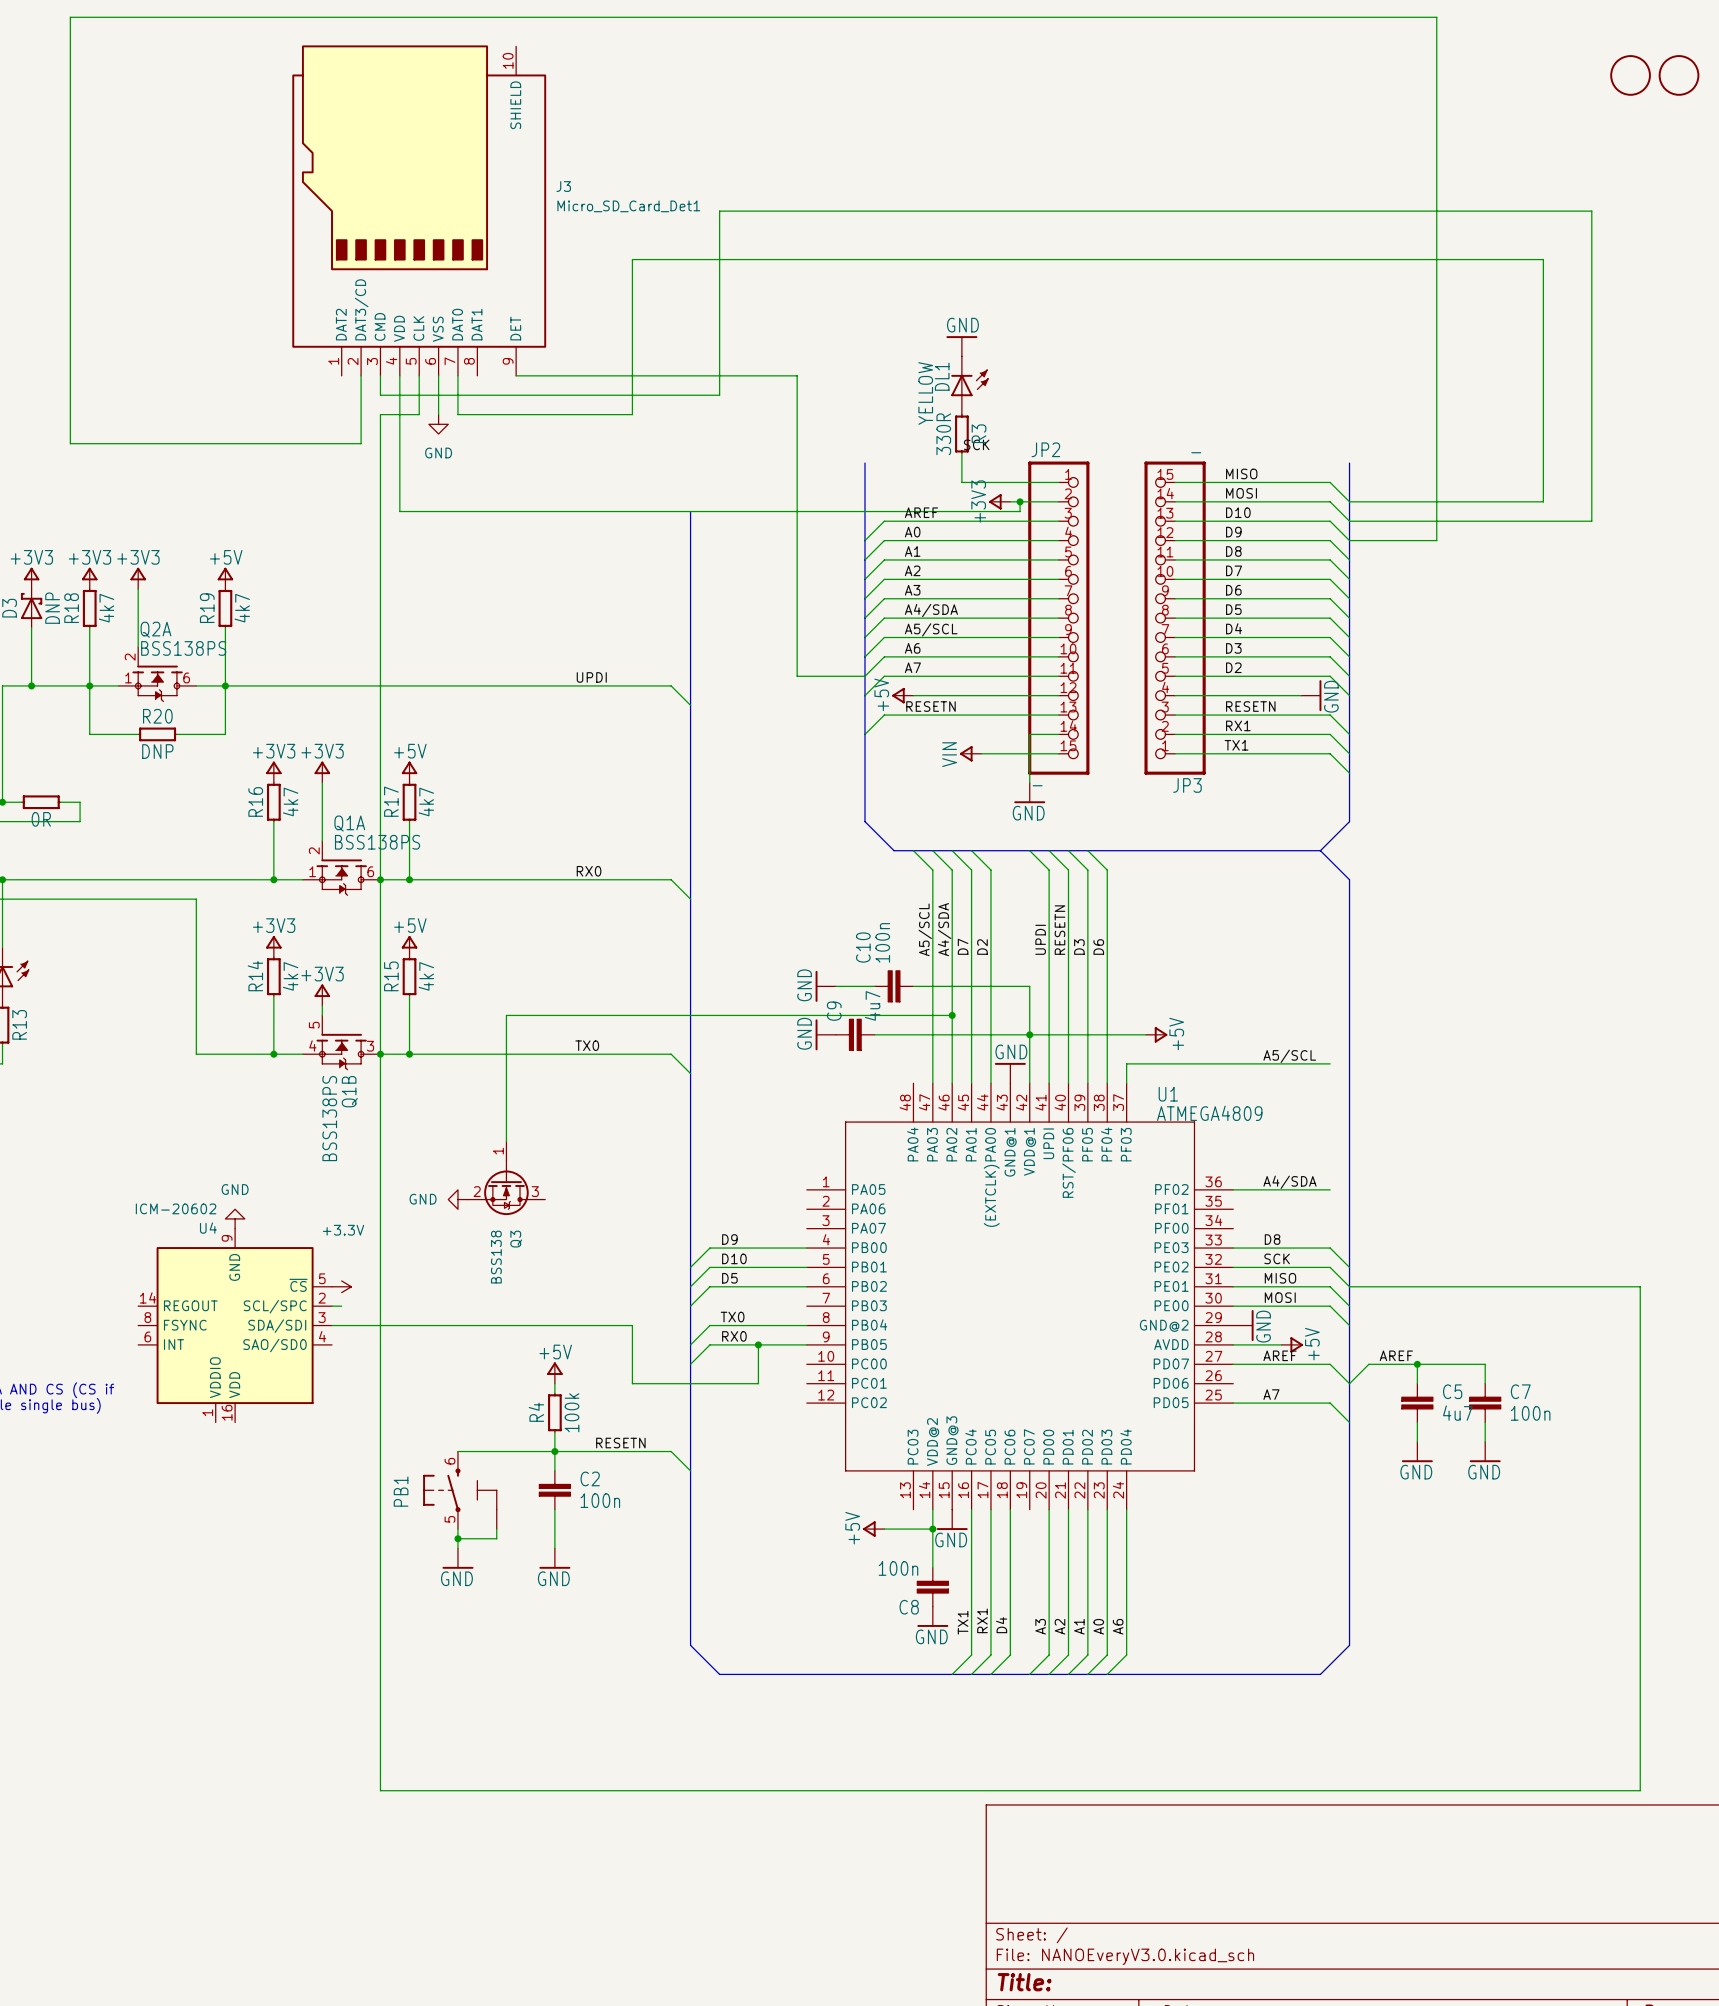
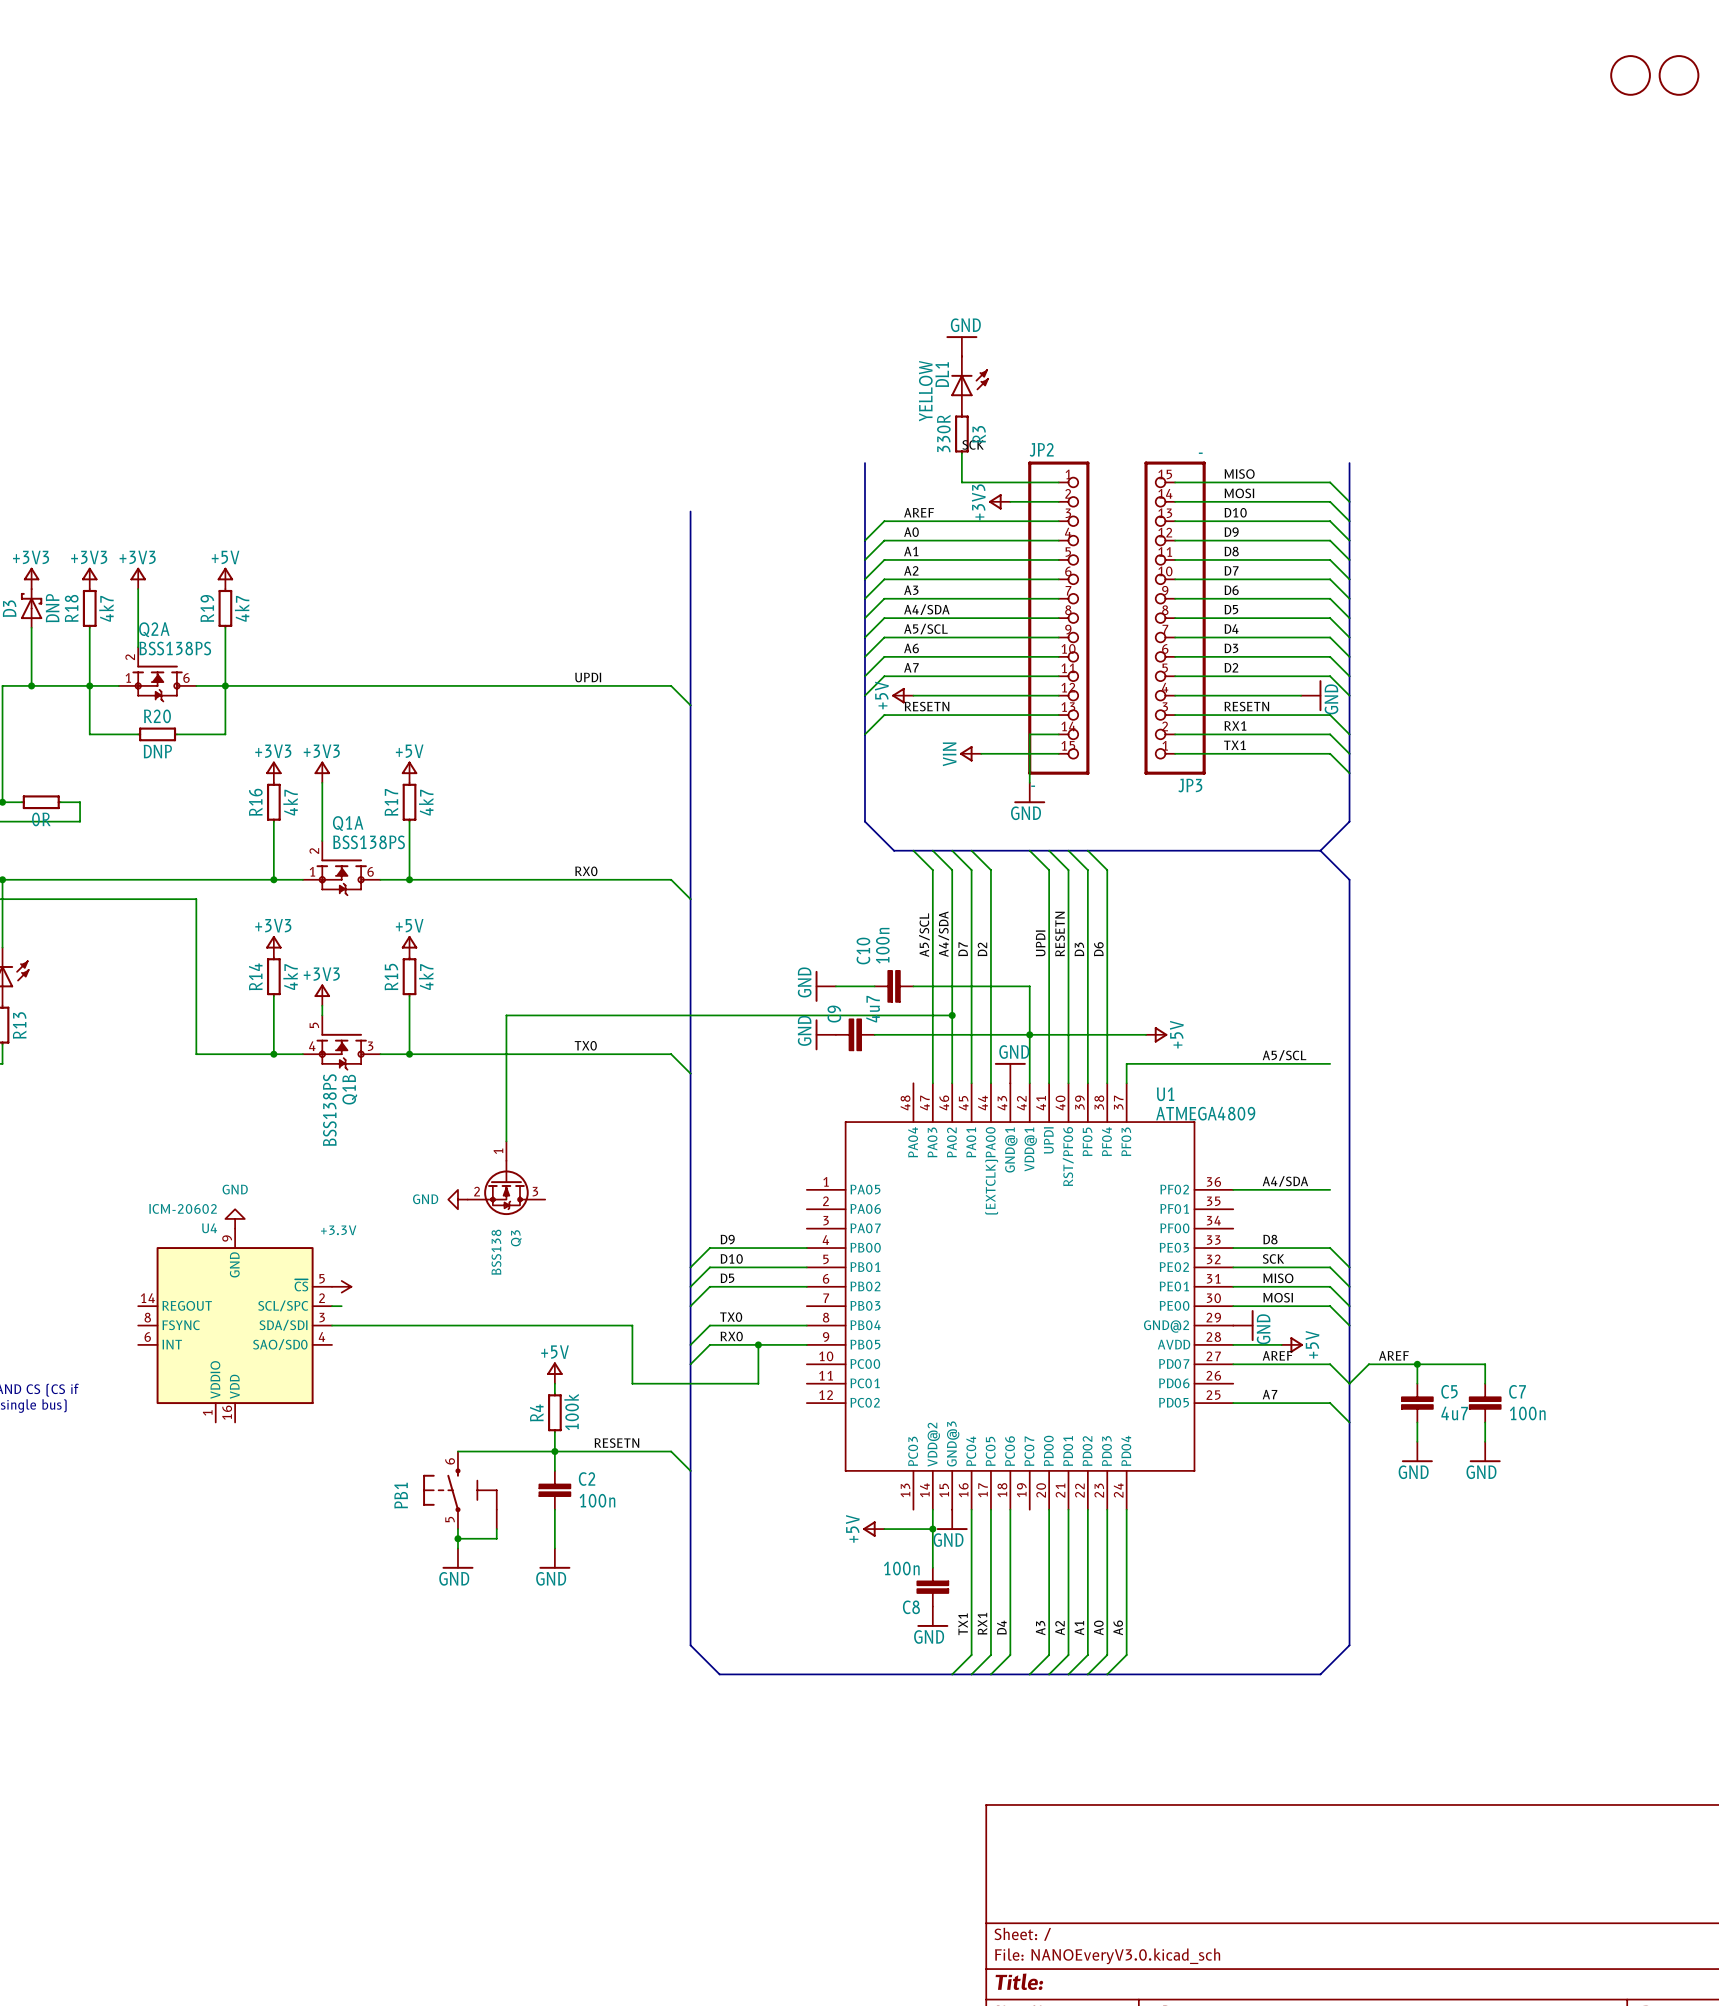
J3: Micro_SD_Card_Det1 (419, 210) -> none
wire: (361, 375) (361, 443) (70, 443) (70, 17) (1436, 17) (1436, 540) (1349, 540) -> none
wire: (380, 375) (380, 395) (719, 395) (719, 211) (1591, 211) (1591, 521) (1349, 521) -> none
wire: (399, 375) (399, 511) (1020, 511) (1020, 501) -> none
wire: (419, 375) (419, 414) (380, 414) (380, 1790) (1640, 1790) (1640, 1286) (1349, 1286) -> none
wire: (438, 375) (438, 414) -> none
wire: (457, 375) (457, 414) (632, 414) (632, 259) (1543, 259) (1543, 501) (1349, 501) -> none
wire: (516, 375) (797, 375) (797, 676) (864, 676) -> none
power symbol: GND (438, 424) -> none
junction: (1020, 501) -> none
junction: (380, 879) -> none
junction: (380, 1054) -> none

